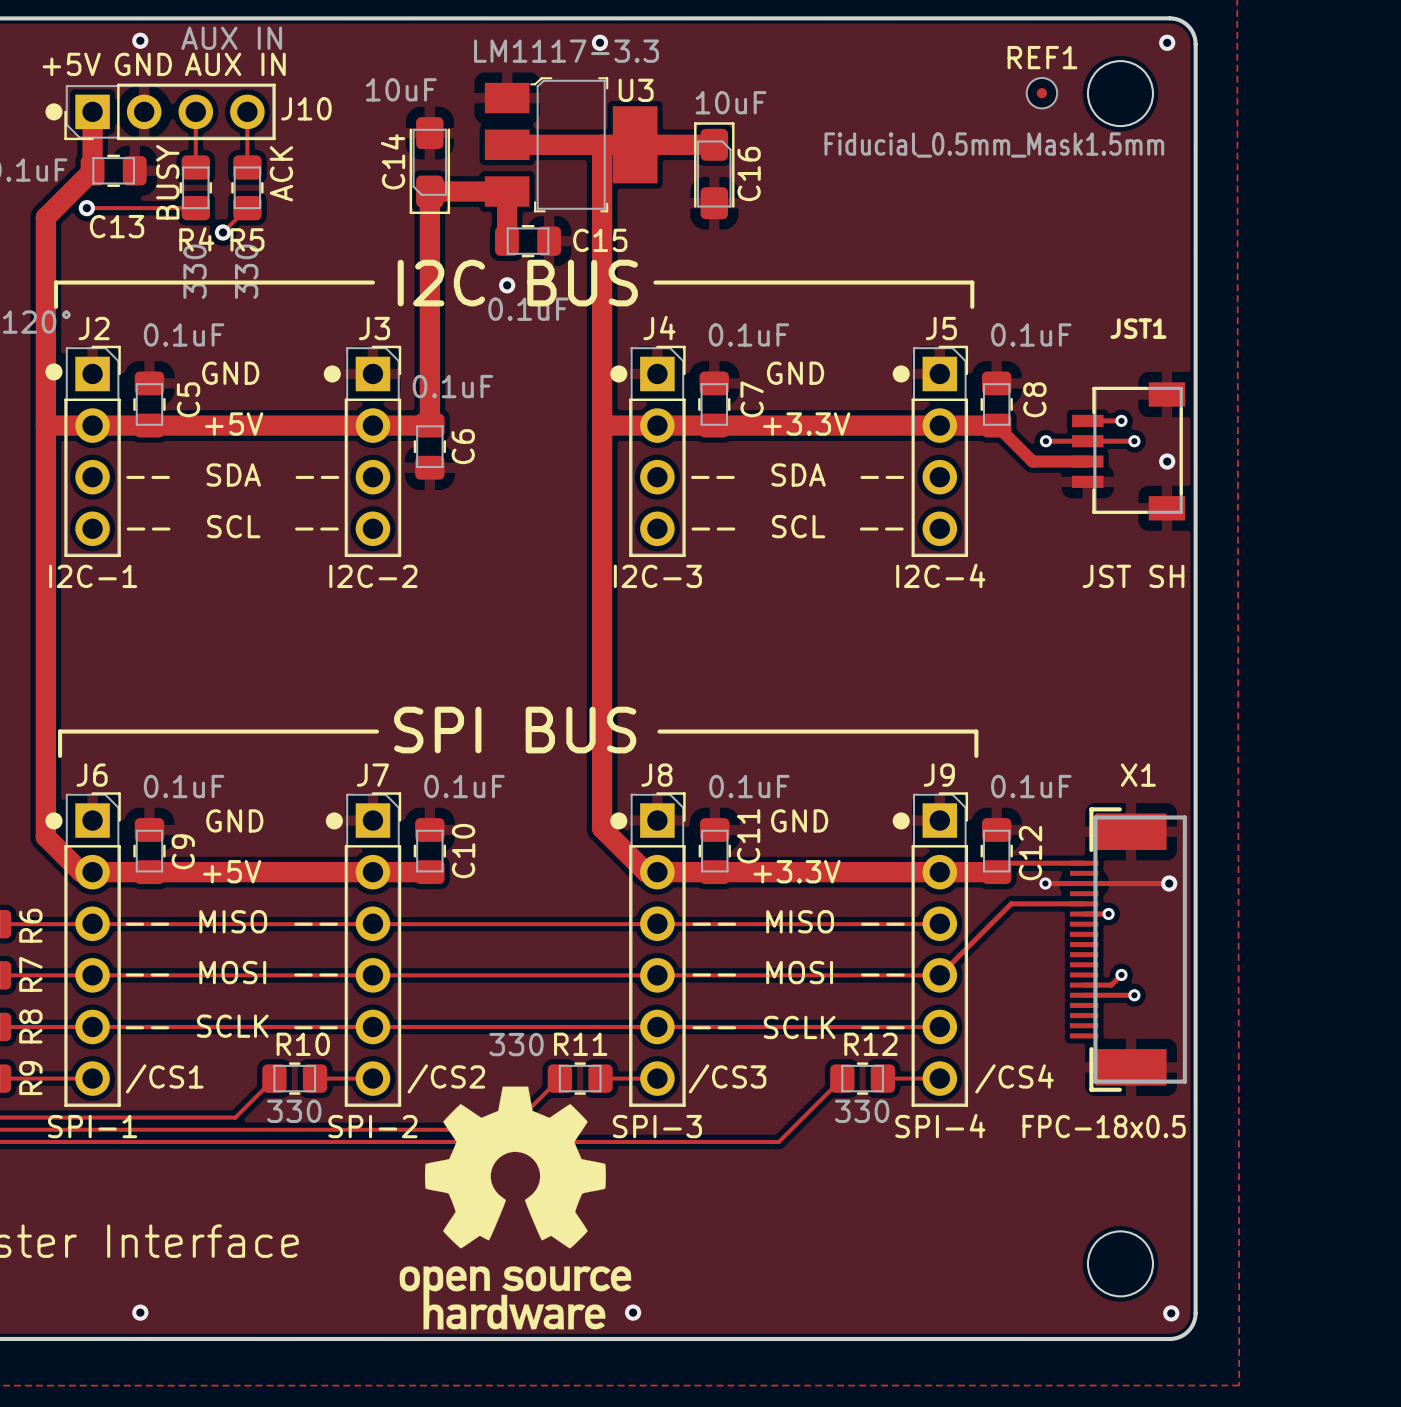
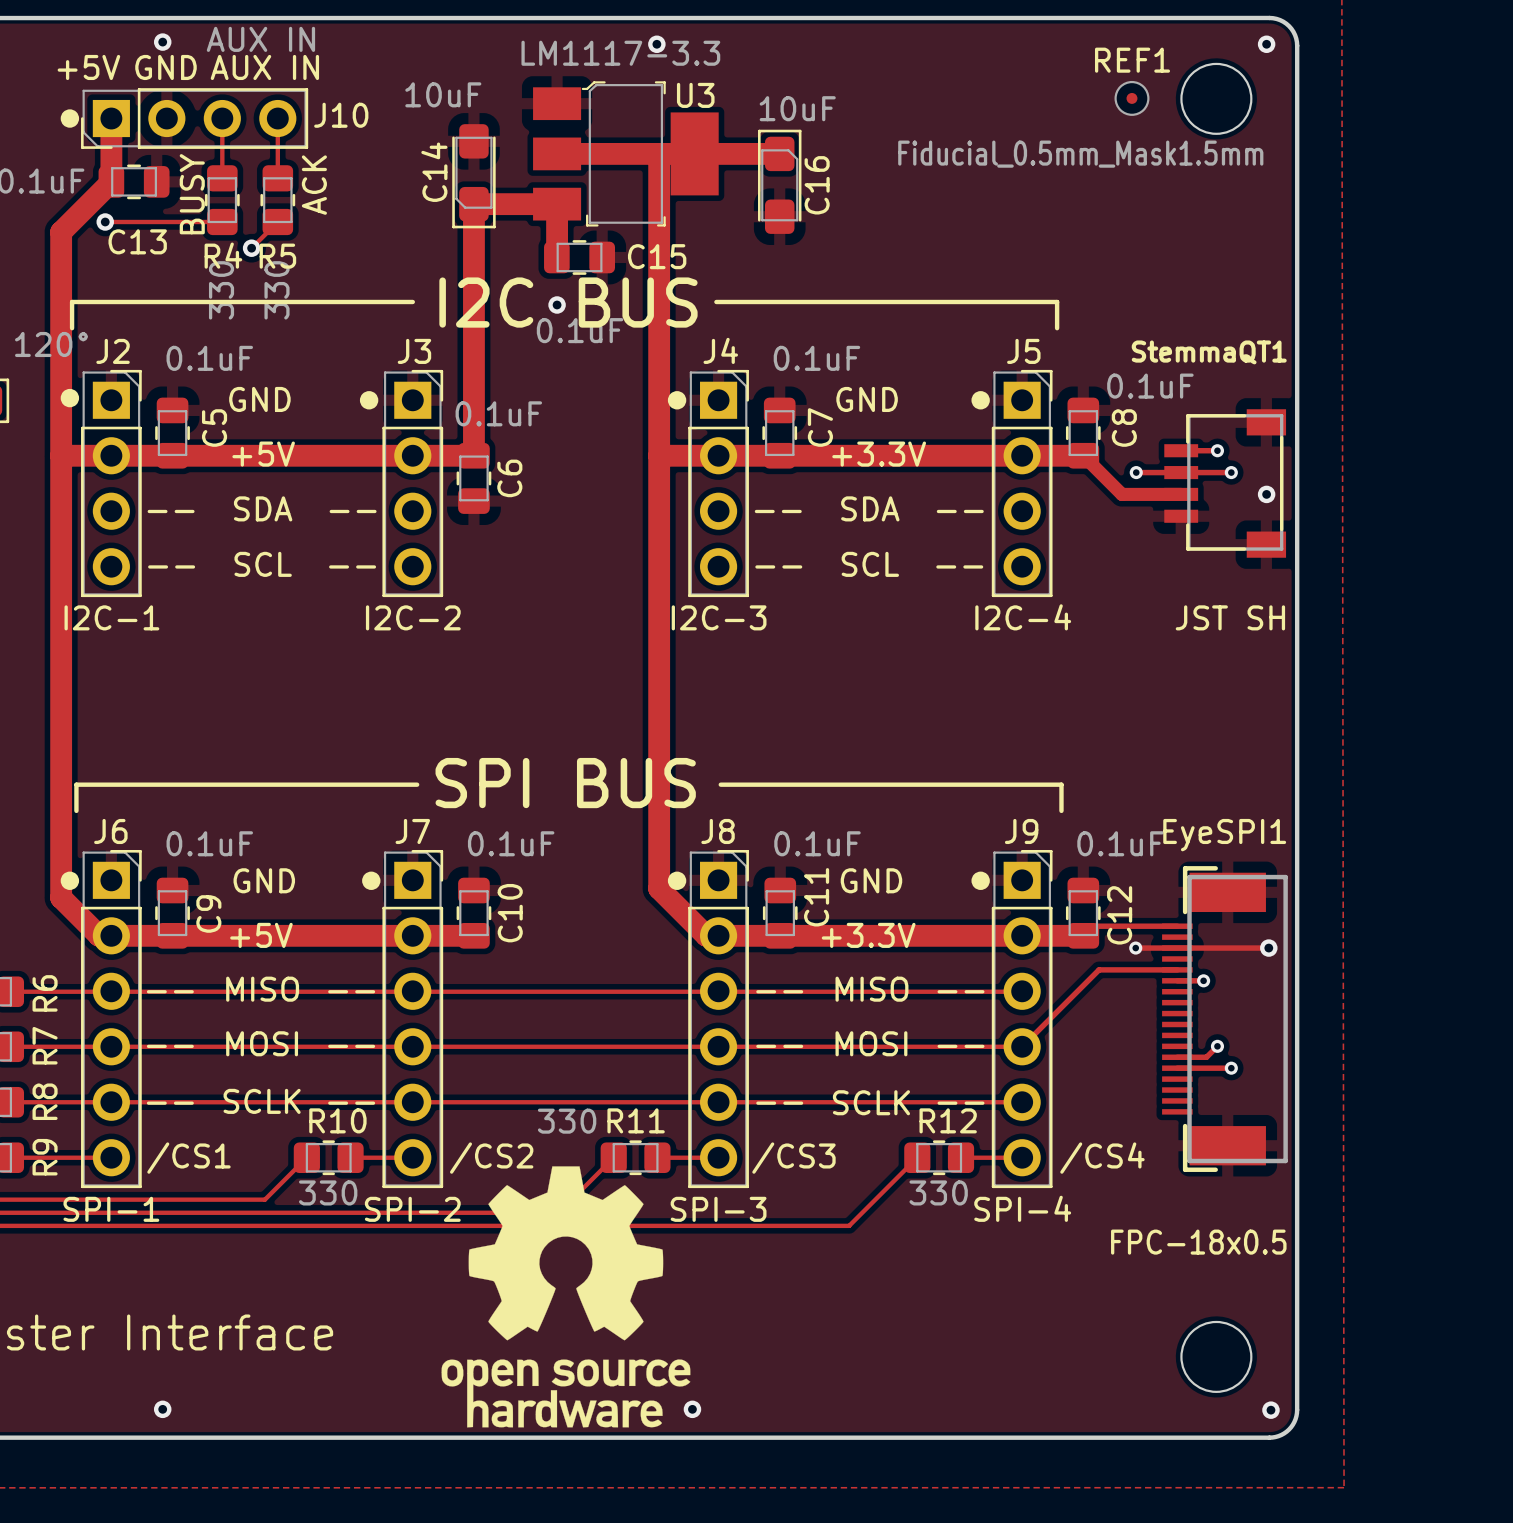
JST1 name: JST1 (1138, 328) -> StemmaQT1 (1209, 352)
C8 value position: 0.1uF (1031, 334) -> 0.1uF (1150, 386)
X1 name: X1 (1138, 775) -> EyeSPI1 (1224, 835)
X1 value position: FPC-18x0.5 (1104, 1126) -> FPC-18x0.5 (1198, 1242)

